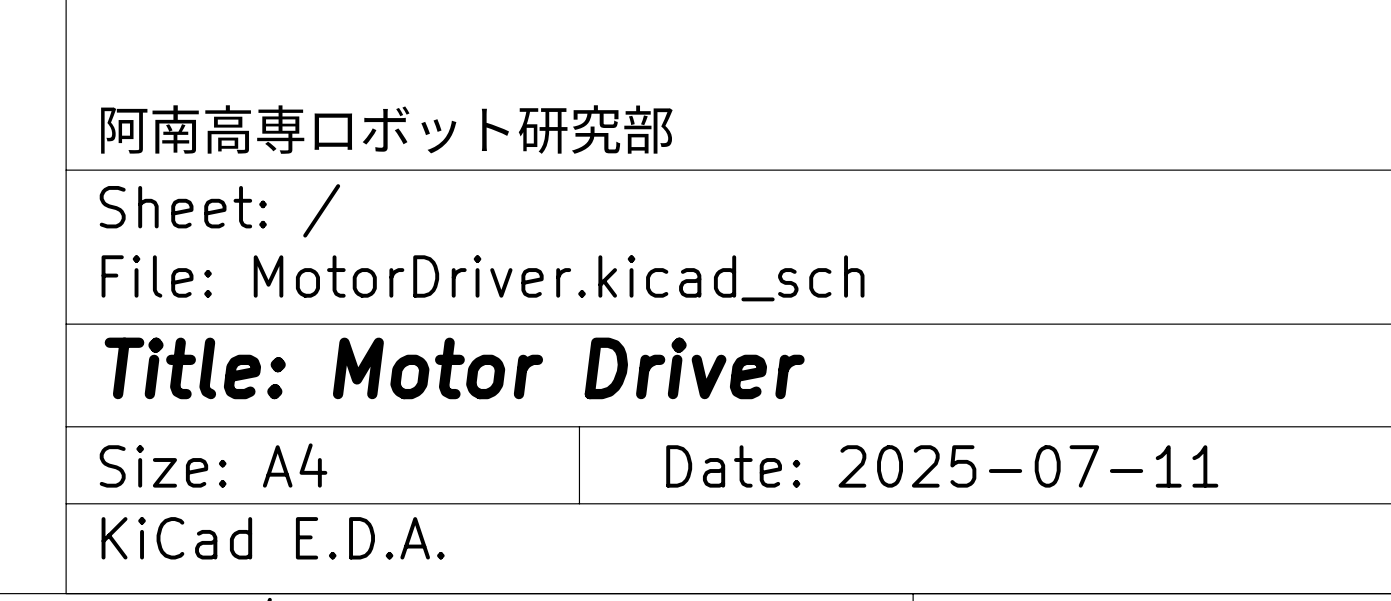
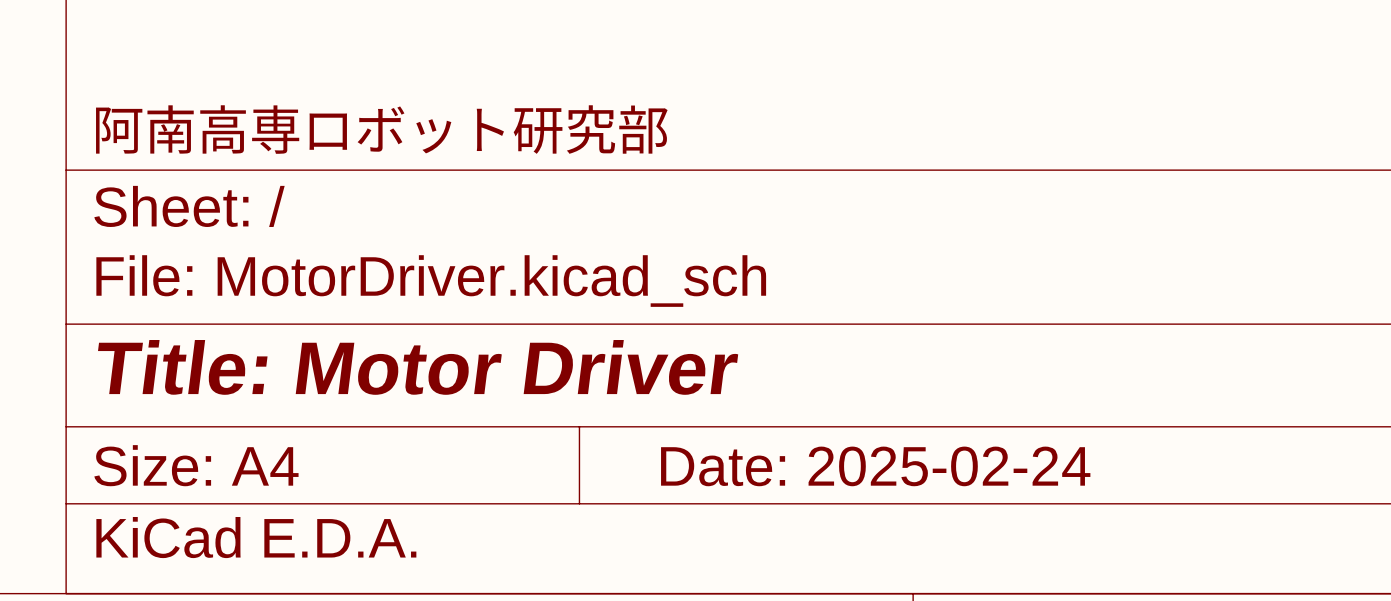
title block: Date: 2025-07-11 (942, 466) -> Date: 2025-02-24 (875, 466)

